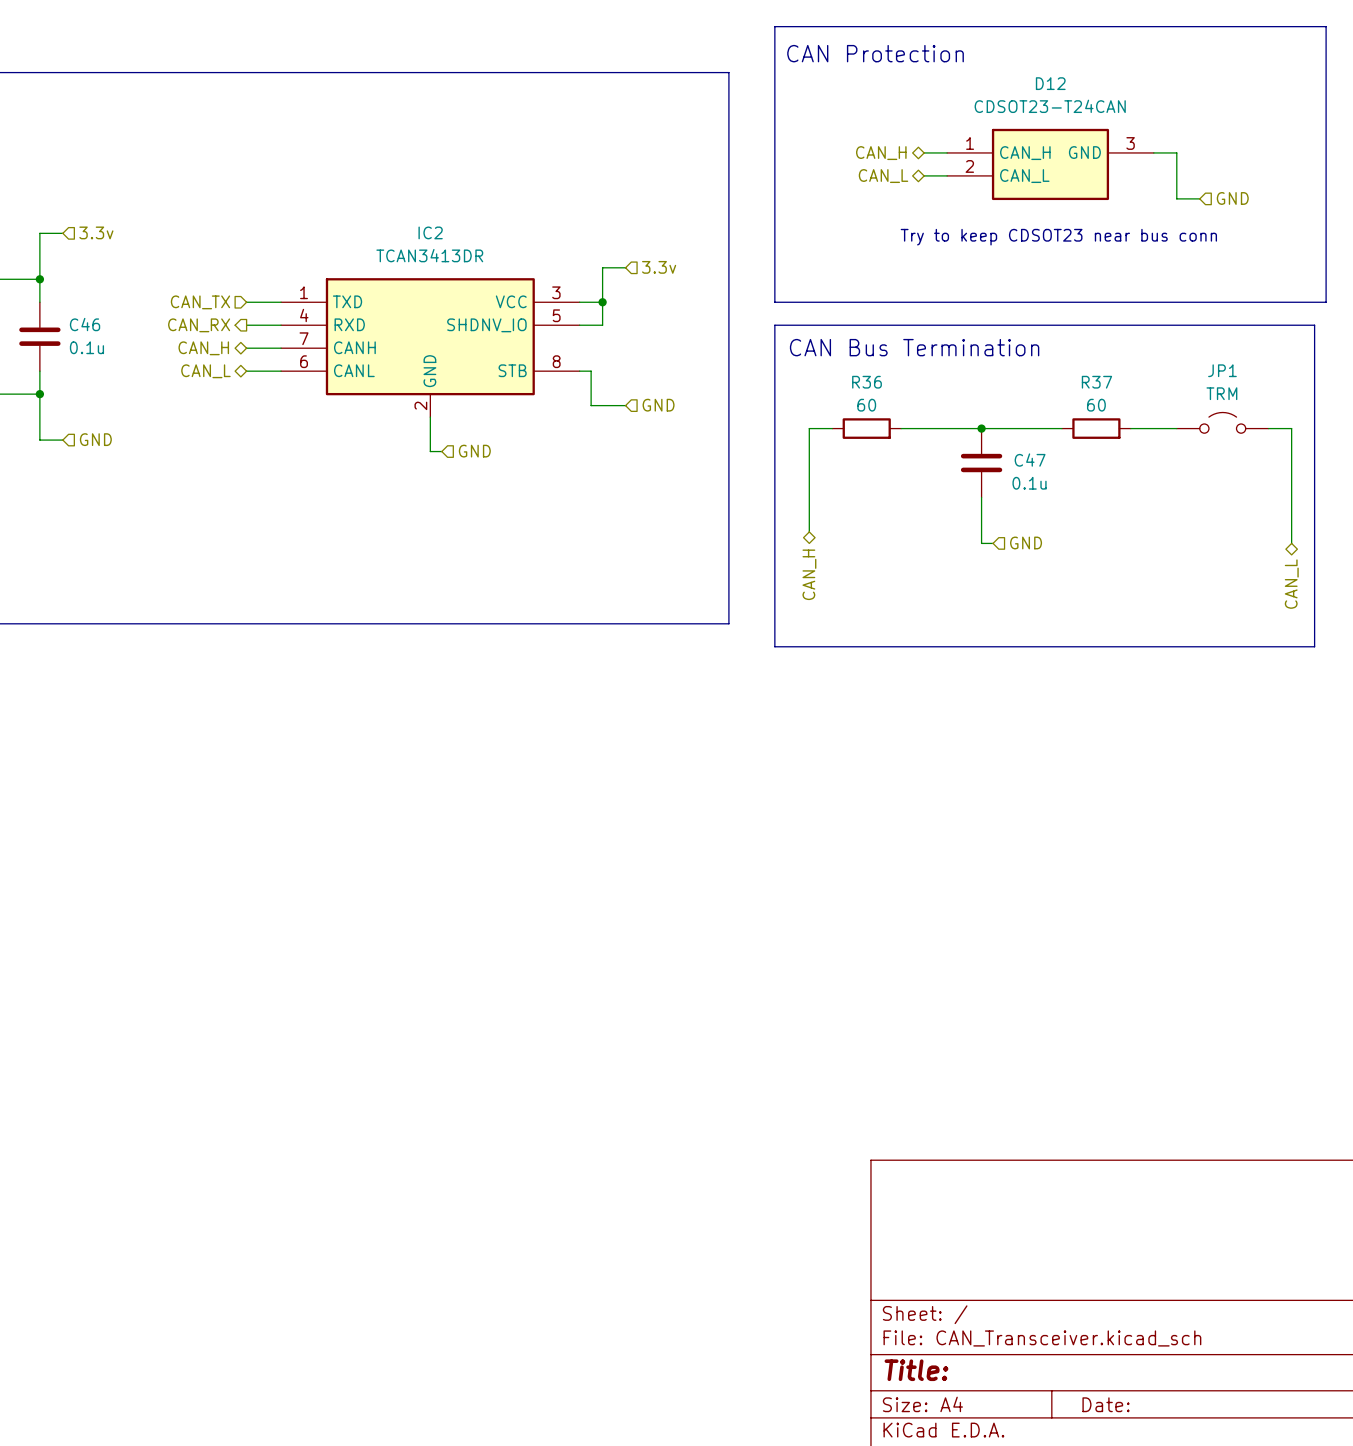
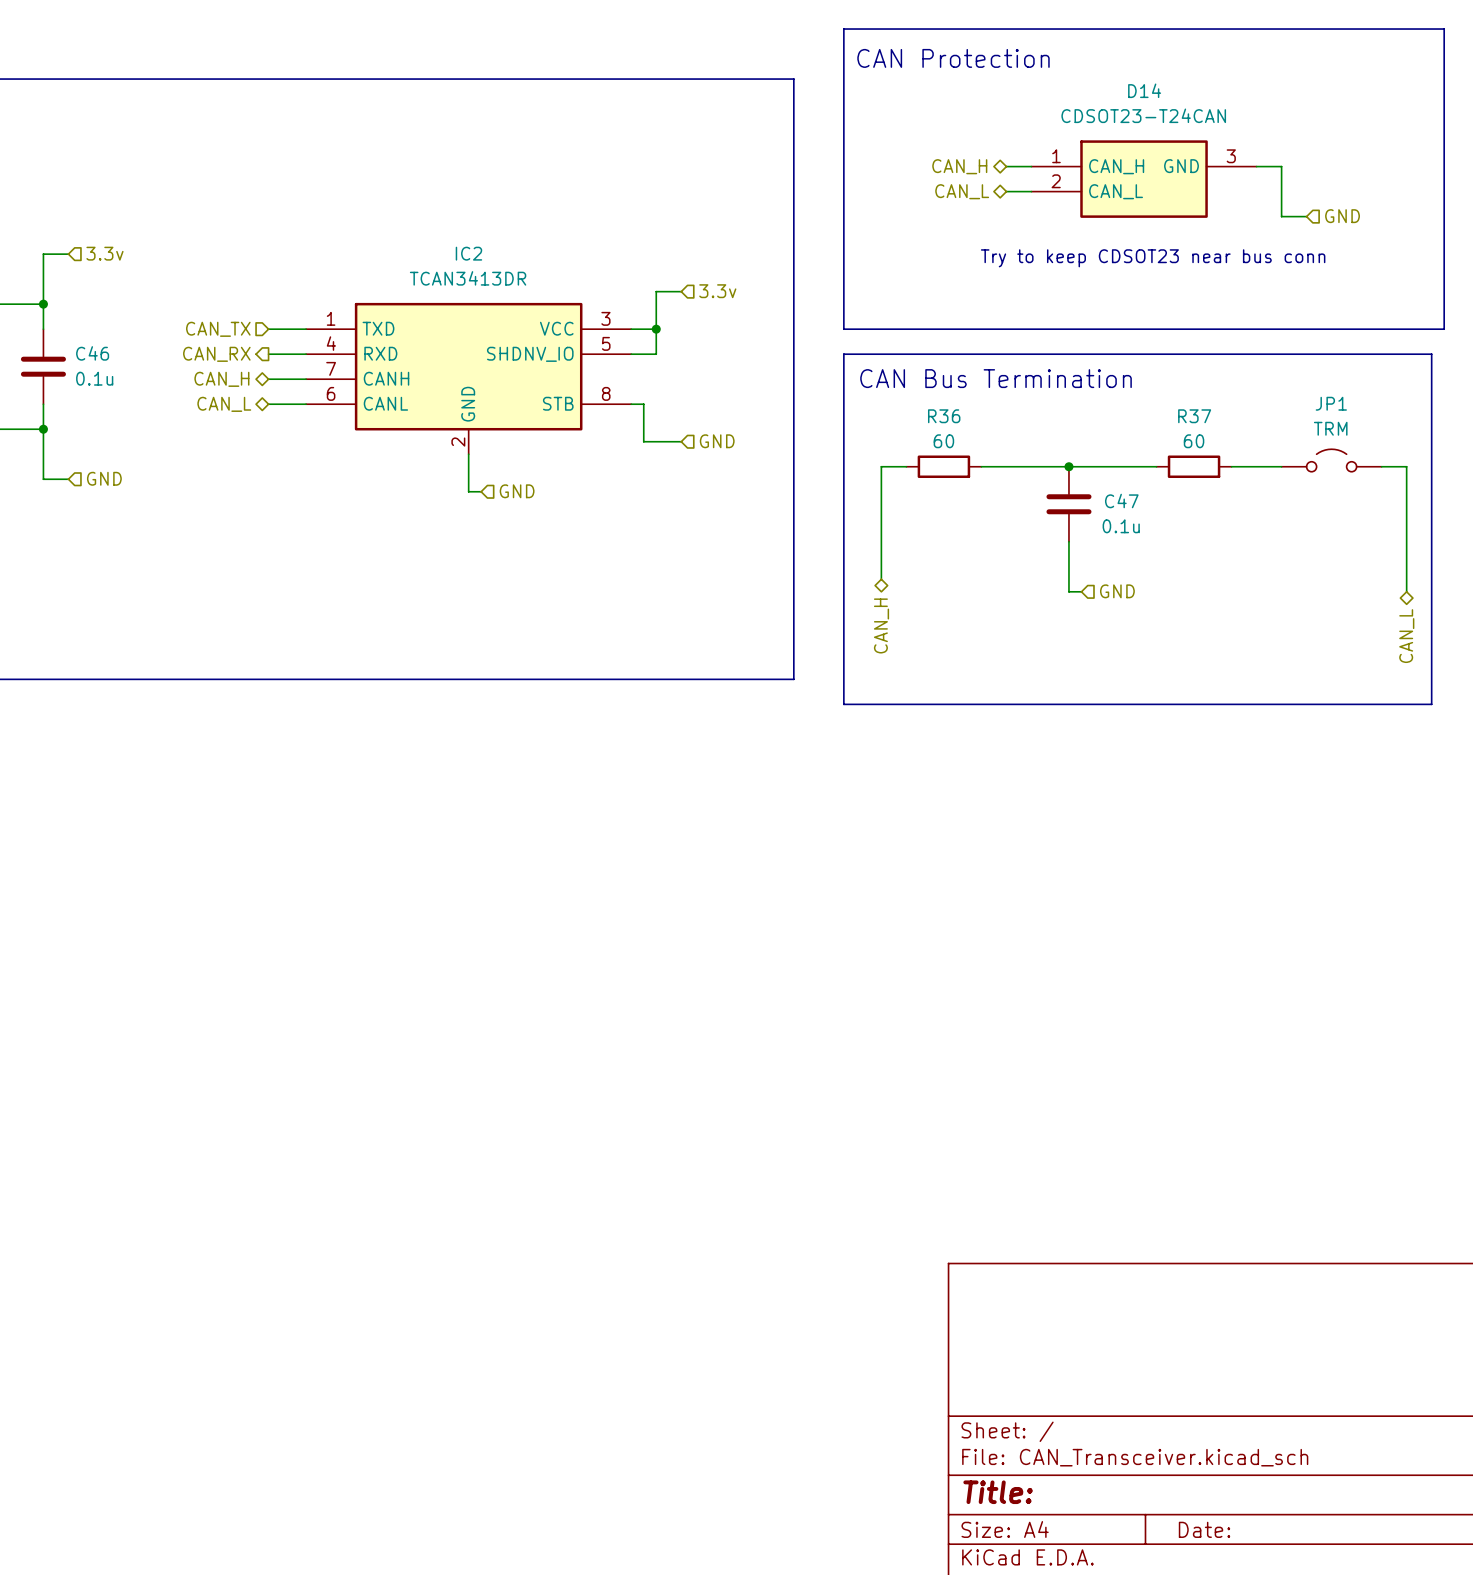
D12 name: D12 (1050, 83) -> D14 (1144, 90)

